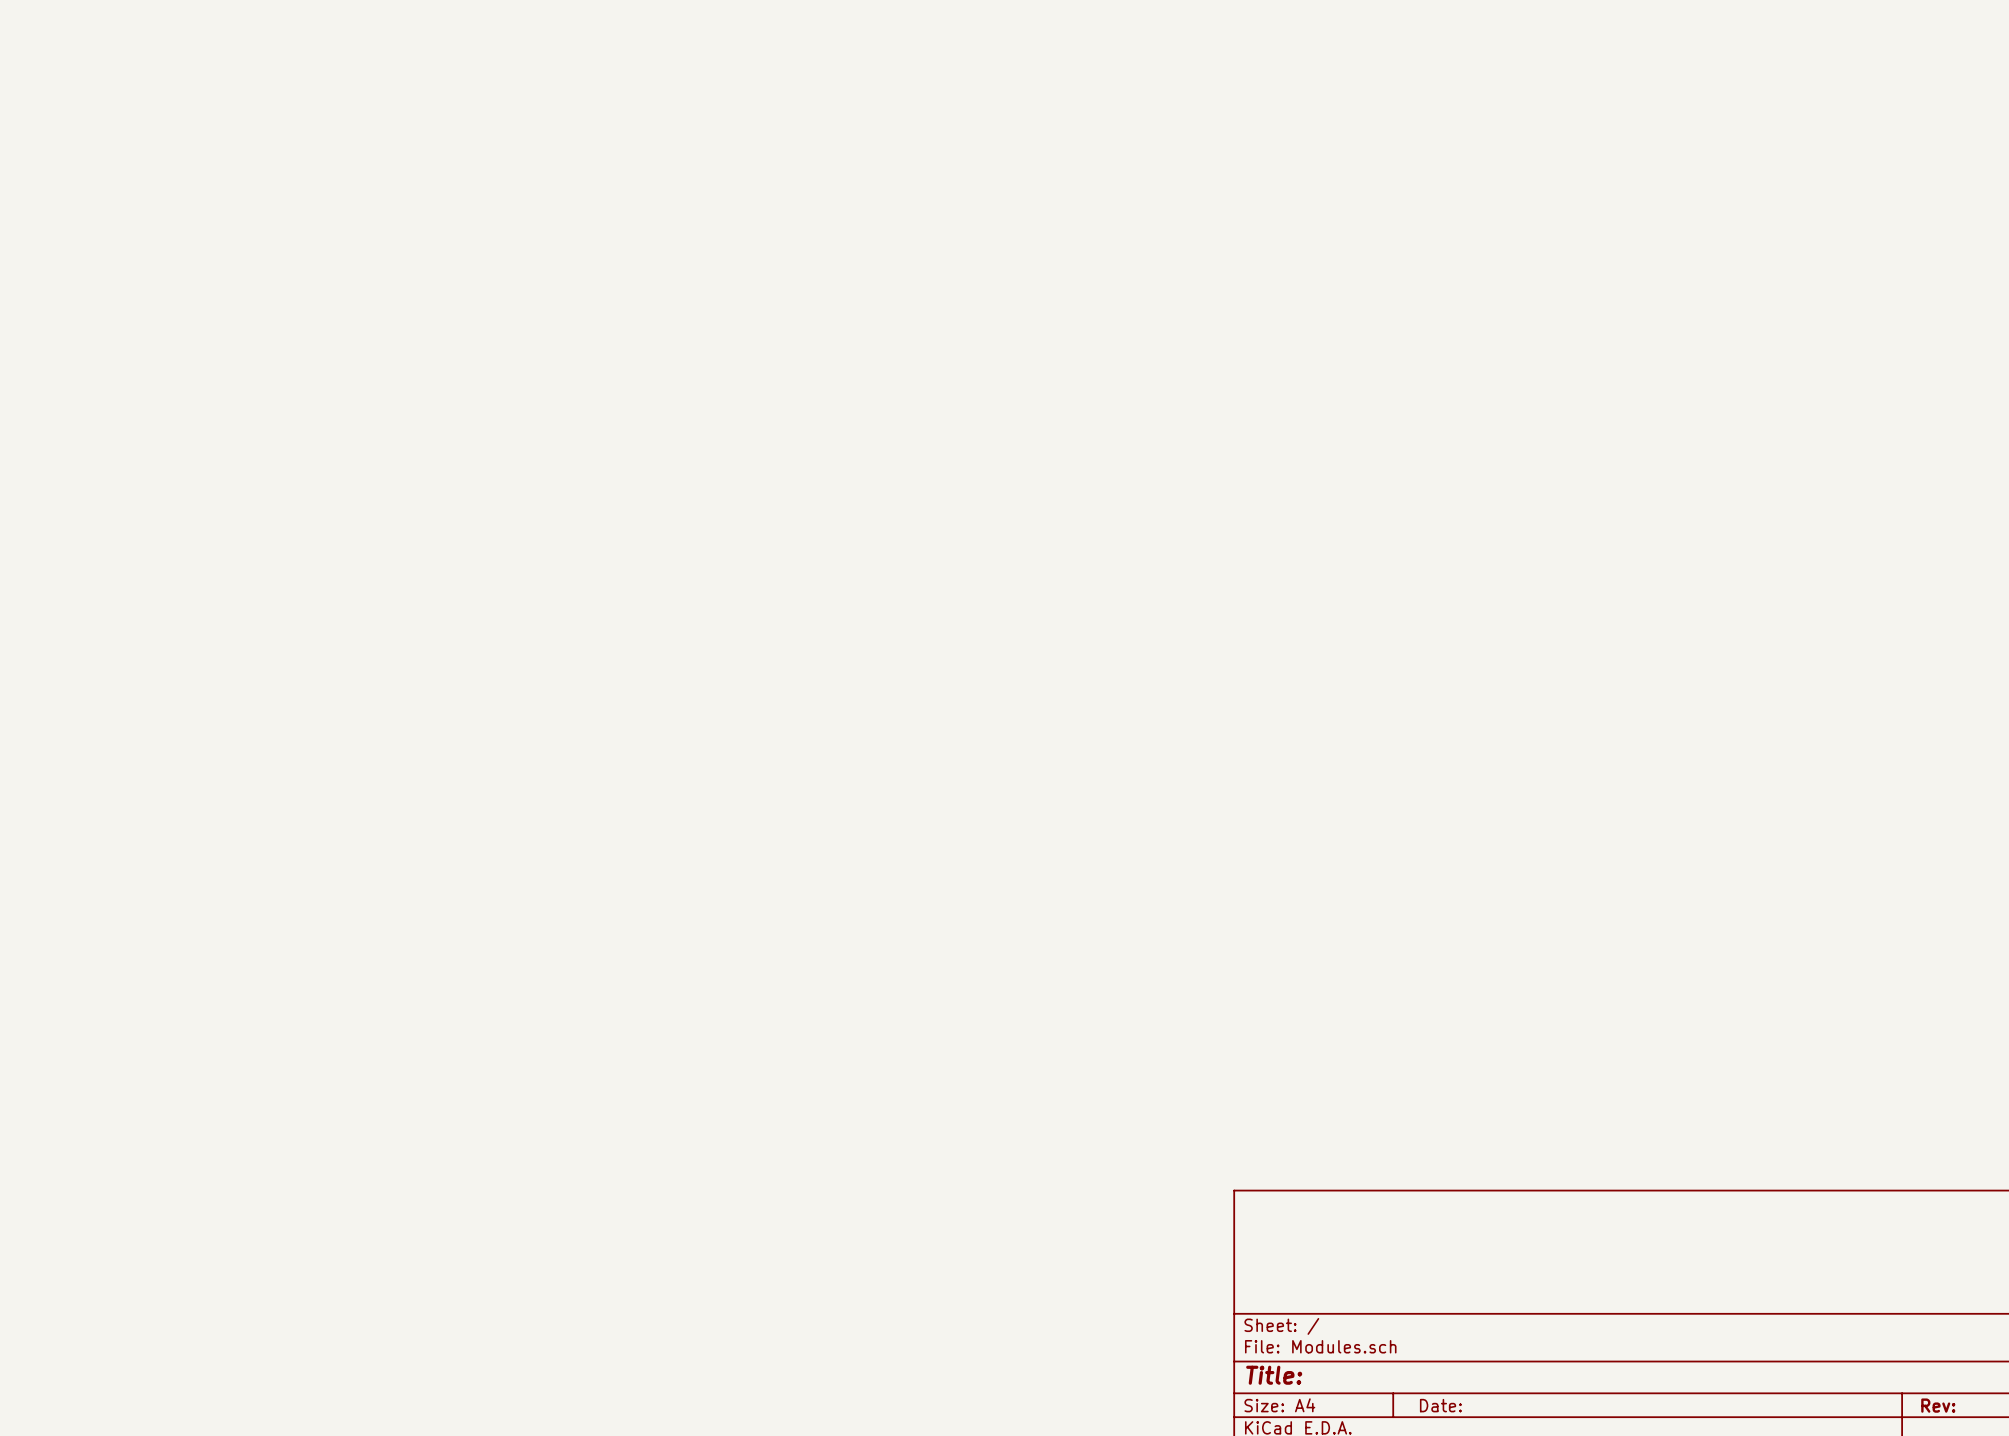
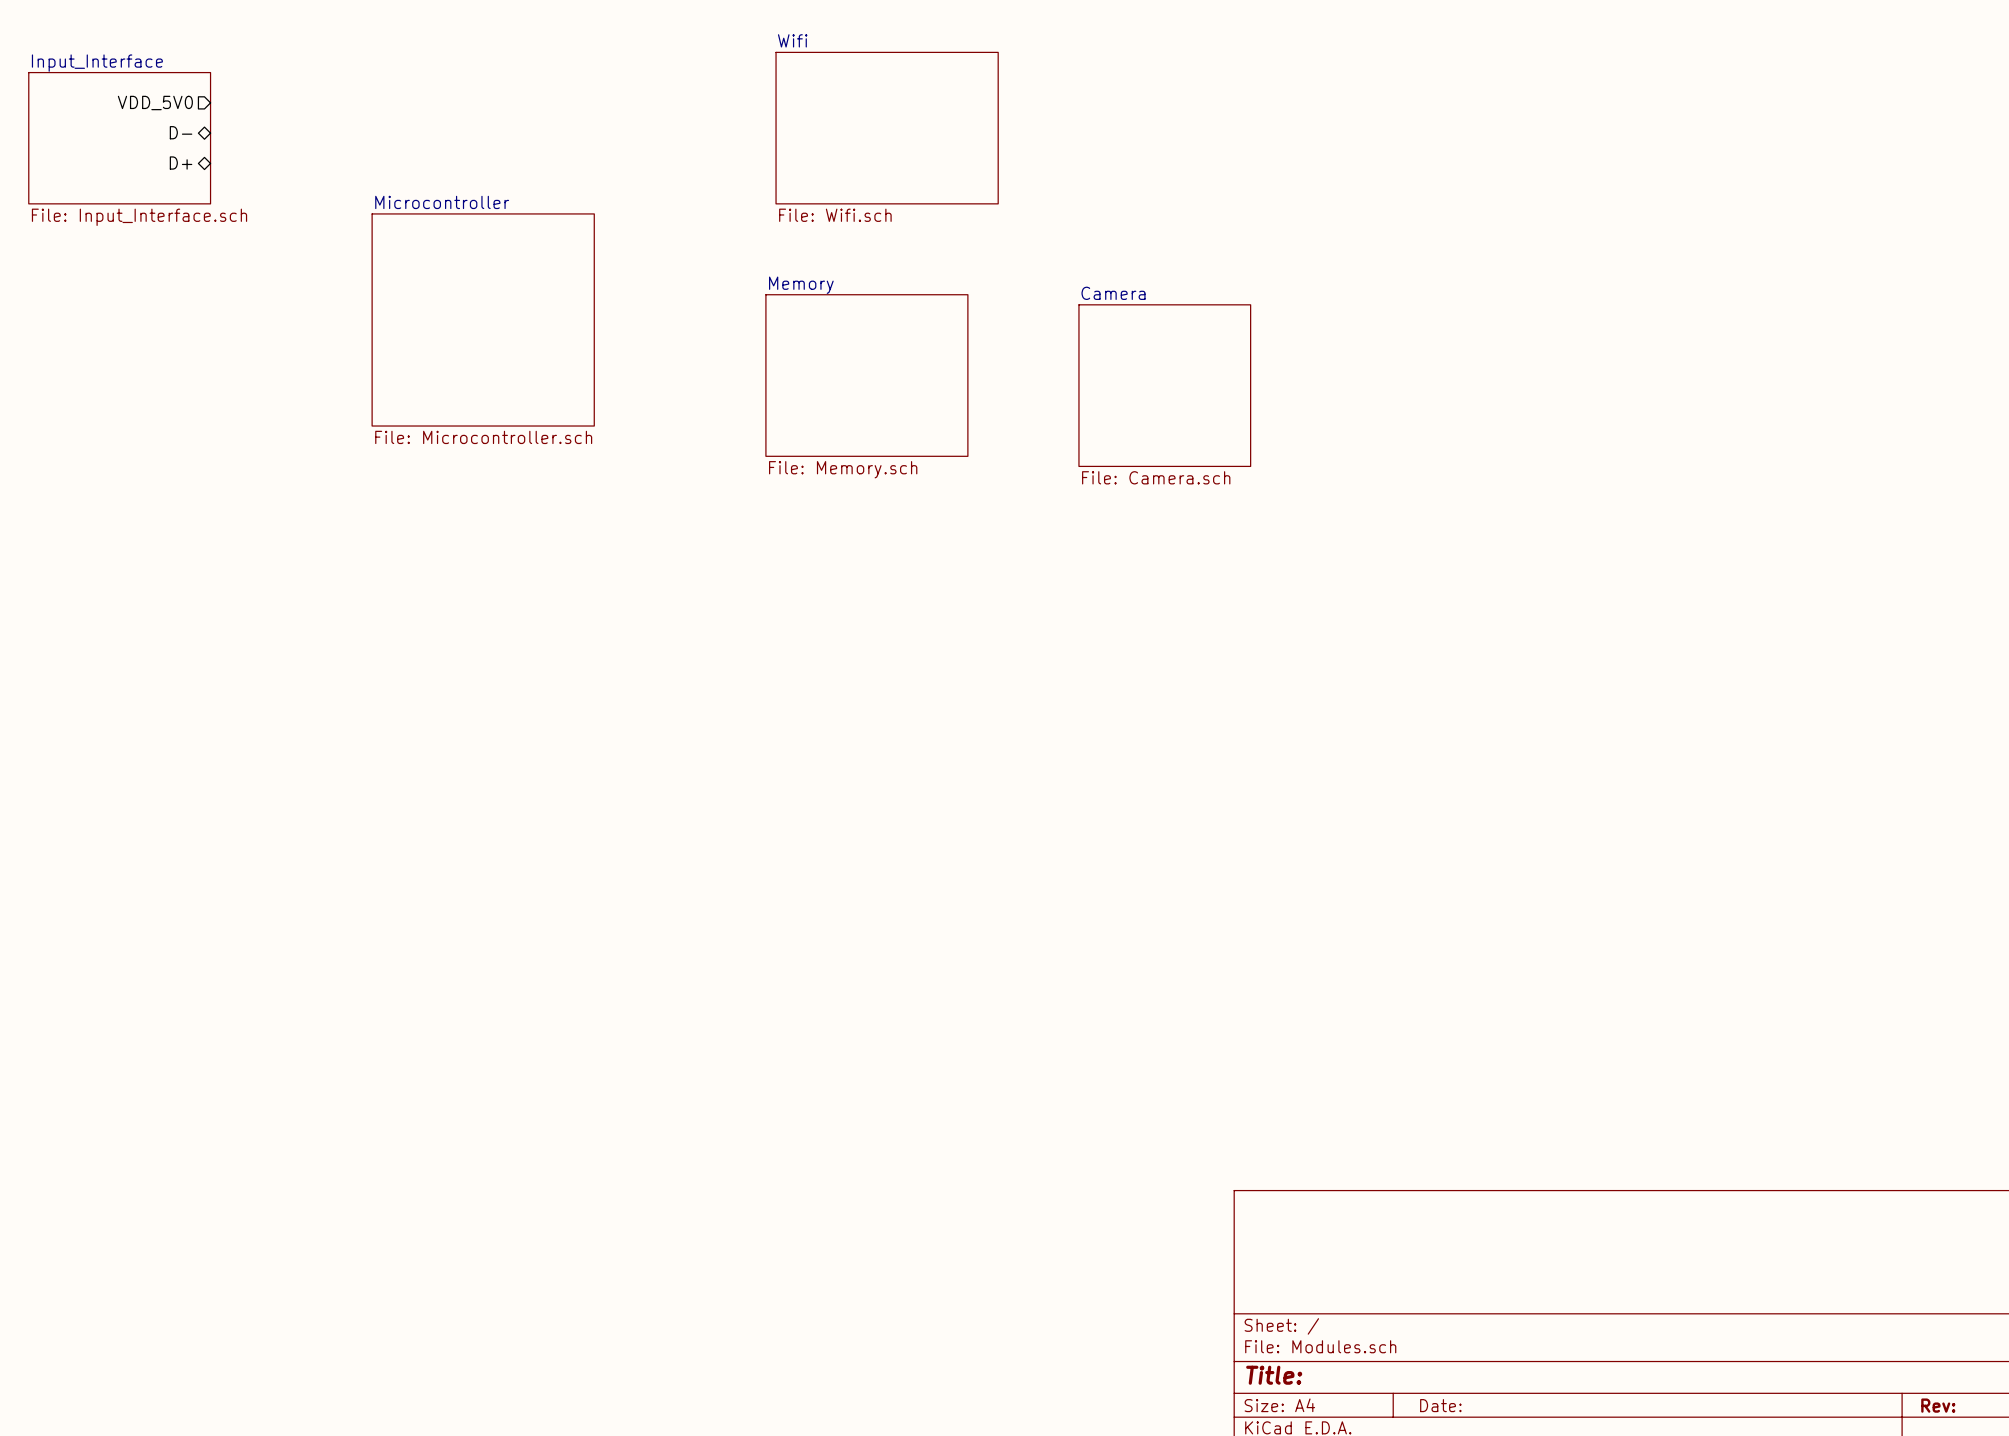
sheet pin: none -> VDD_5V0 (155, 103)
sheet Wifi: none -> File: Wifi.sch (887, 128)
sheet pin: none -> D- (181, 132)
sheet Input_Interface: none -> File: Input_Interface.sch (119, 138)
sheet pin: none -> D+ (181, 163)
sheet Microcontroller: none -> File: Microcontroller.sch (483, 319)
sheet Memory: none -> File: Memory.sch (866, 375)
sheet Camera: none -> File: Camera.sch (1164, 385)

